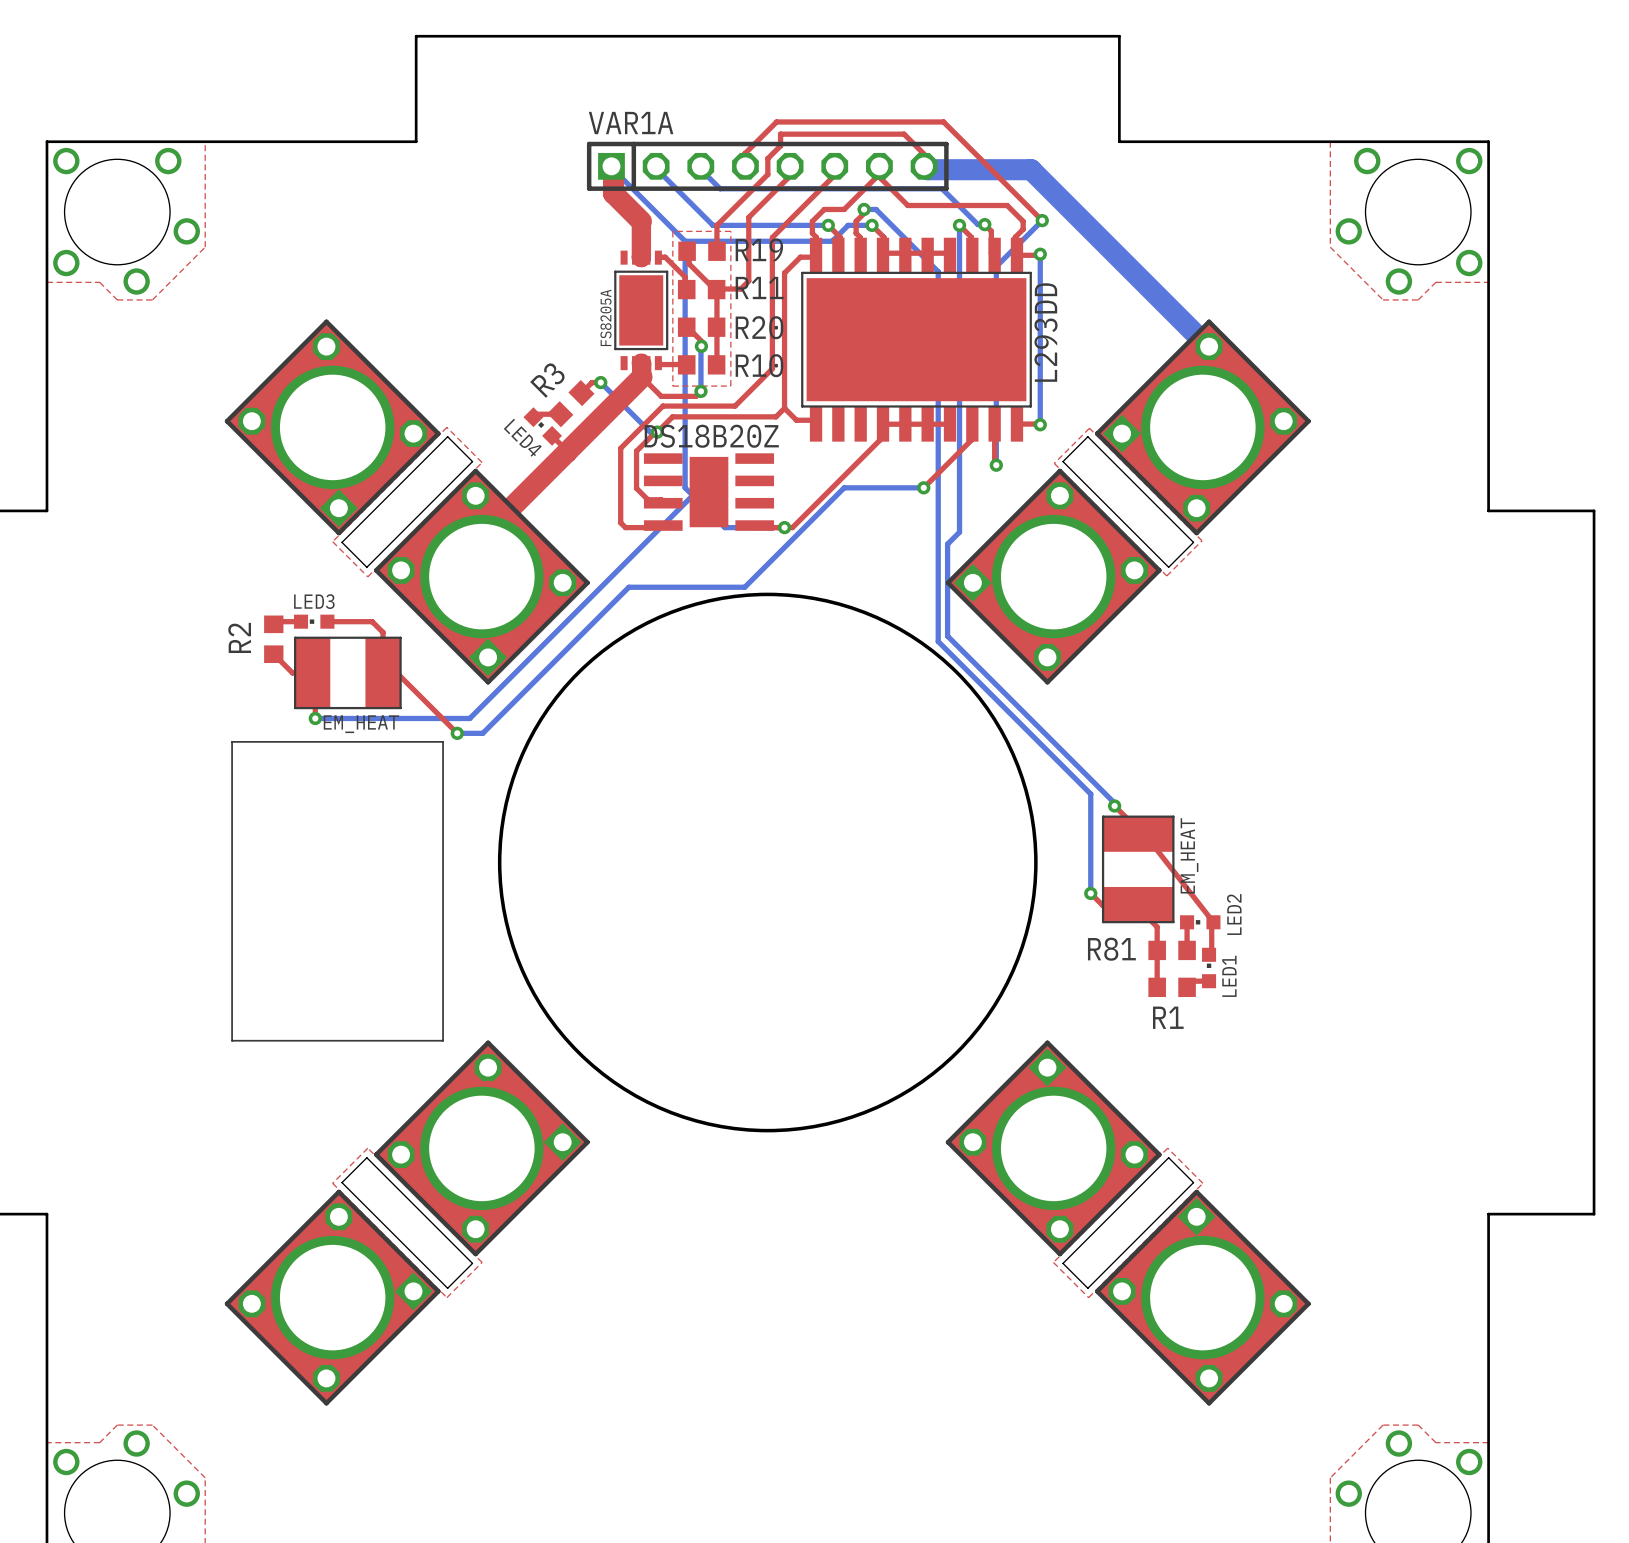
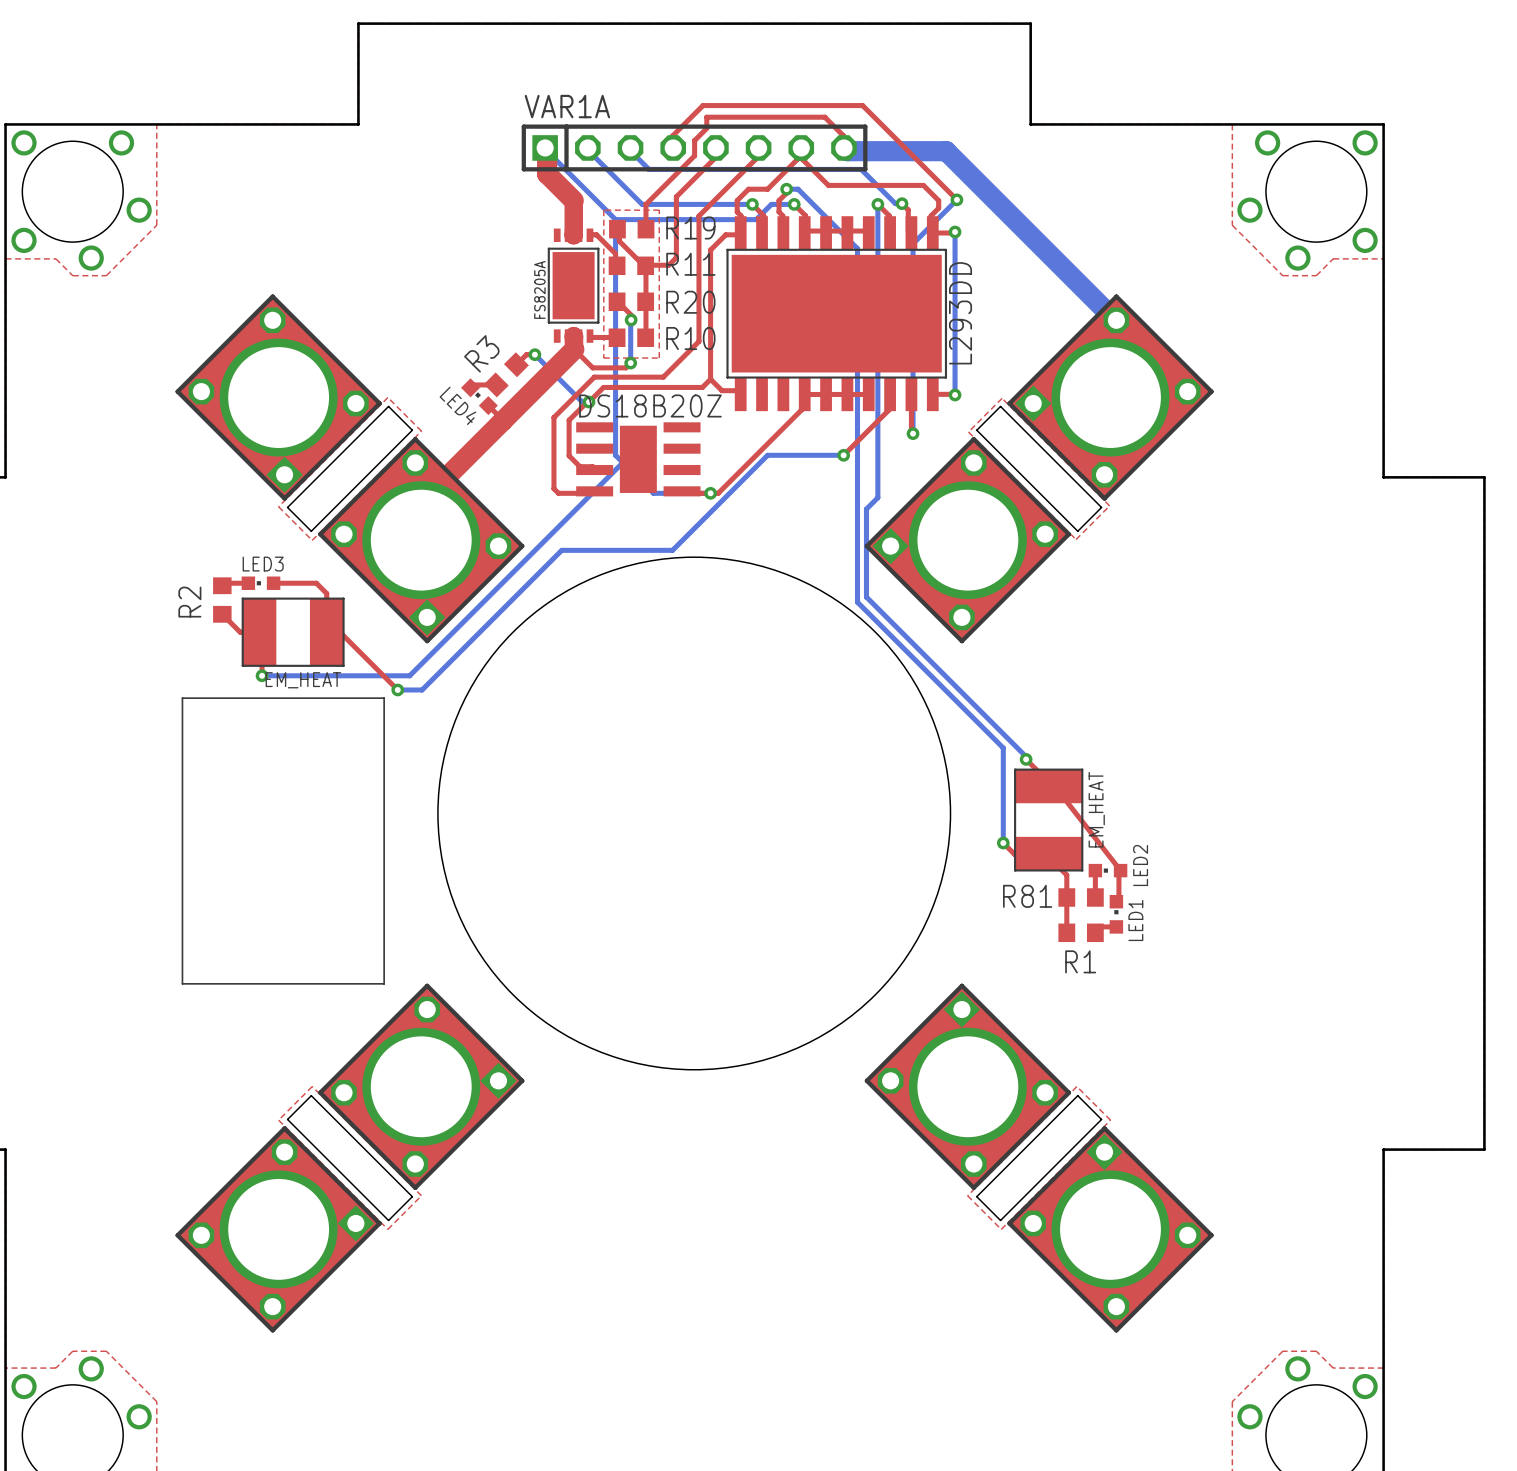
round board edge: [497, 592, 1038, 1133] -> none

